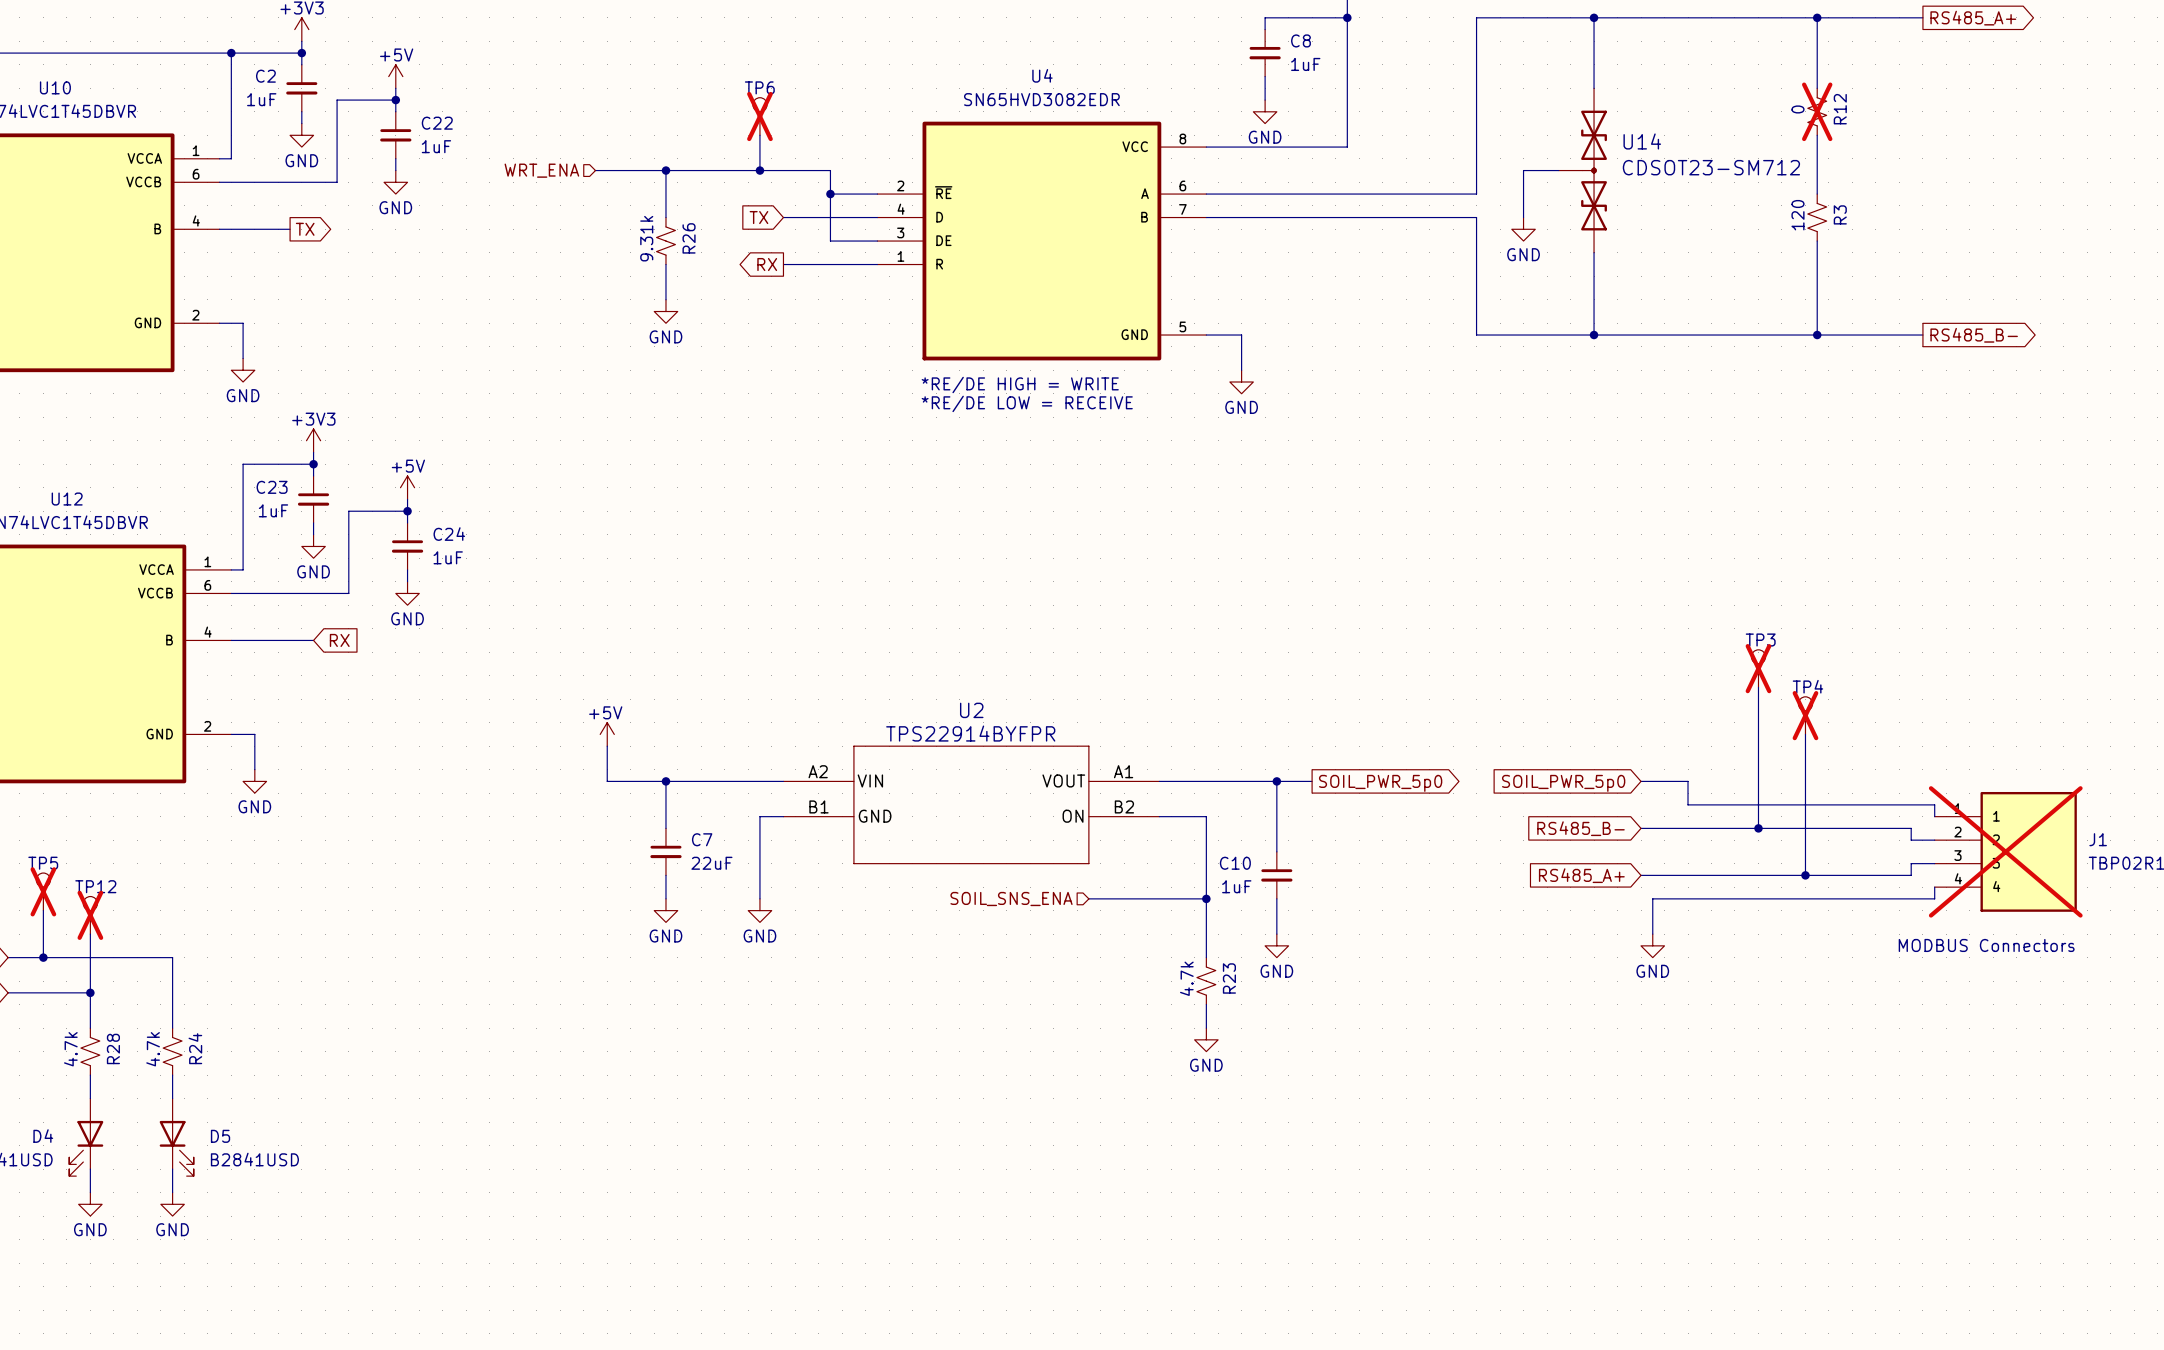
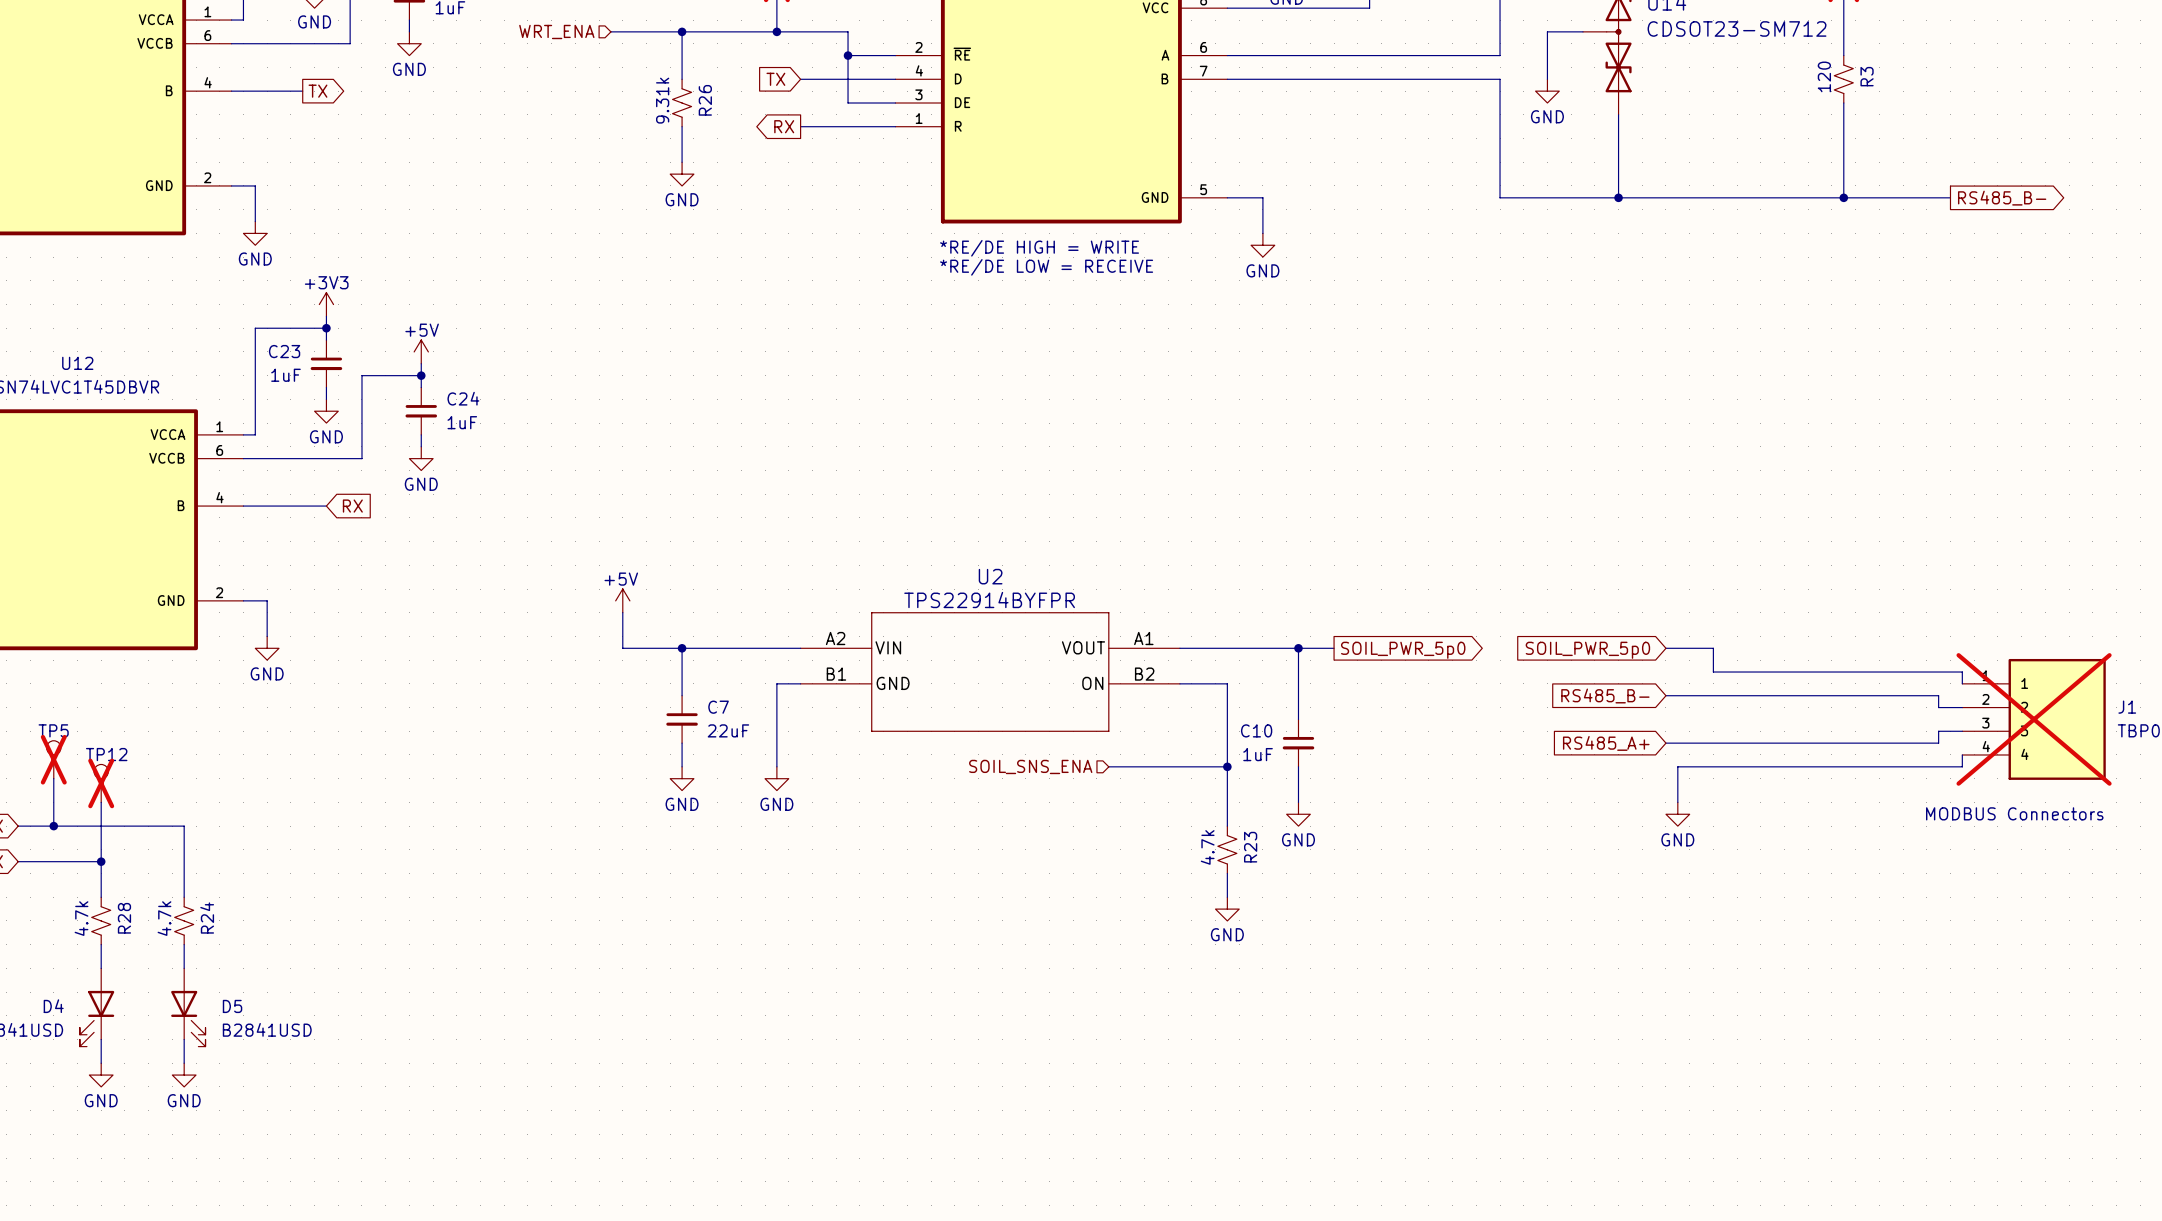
TP3: (1758, 668) -> none
wire: (1758, 687) (1758, 828) -> none
TP4: (1805, 715) -> none
wire: (1805, 734) (1805, 875) -> none
junction: (1758, 828) -> none
junction: (1805, 875) -> none

